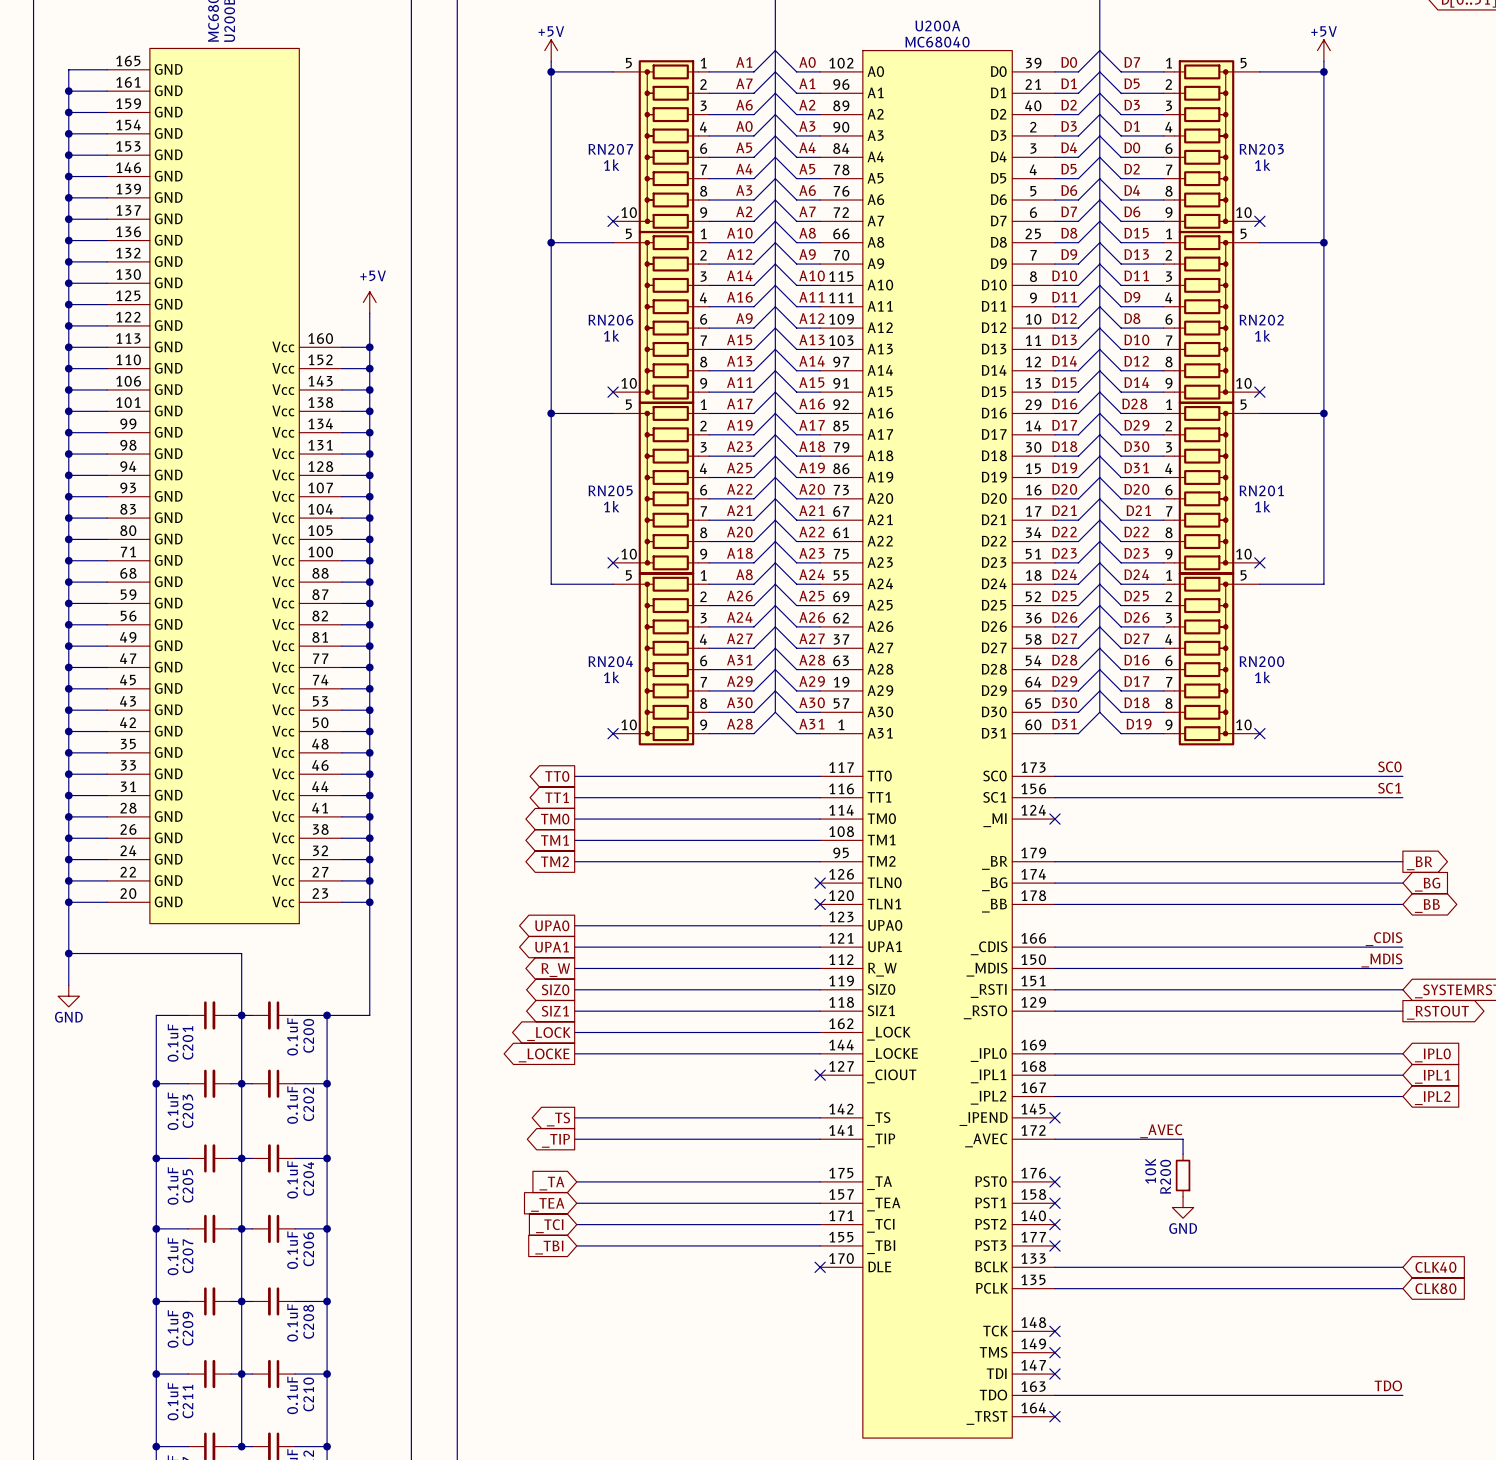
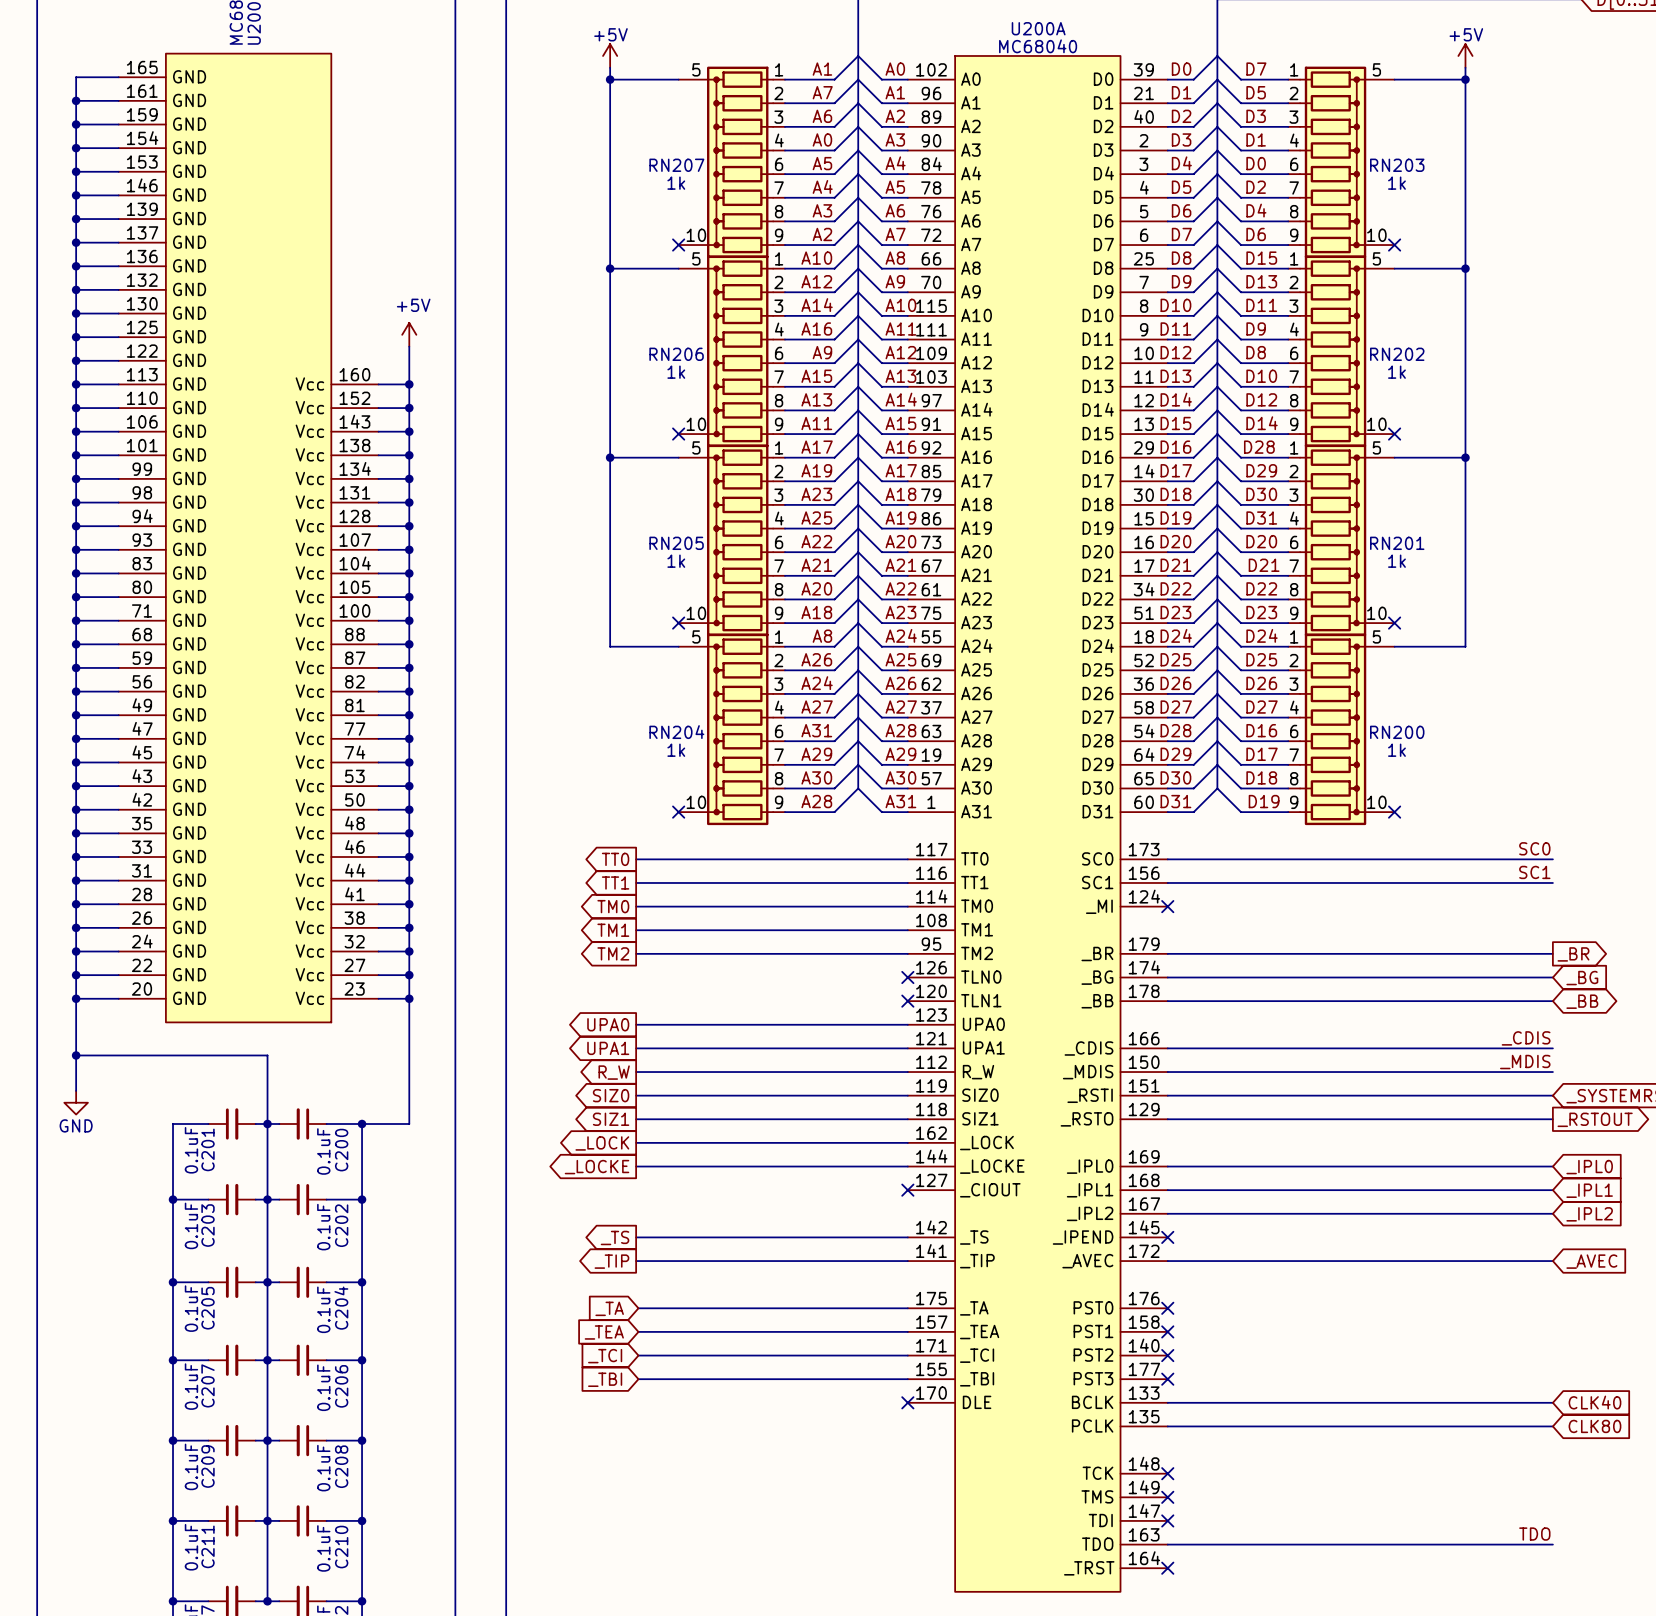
label: _AVEC (1161, 1131) -> none
wire: (1183, 1139) (1183, 1154) -> (1309, 1261) (1552, 1261)
global label: none -> _AVEC (1591, 1261)
R200: 10K (1183, 1175) -> none
power symbol: GND (1183, 1207) -> none

